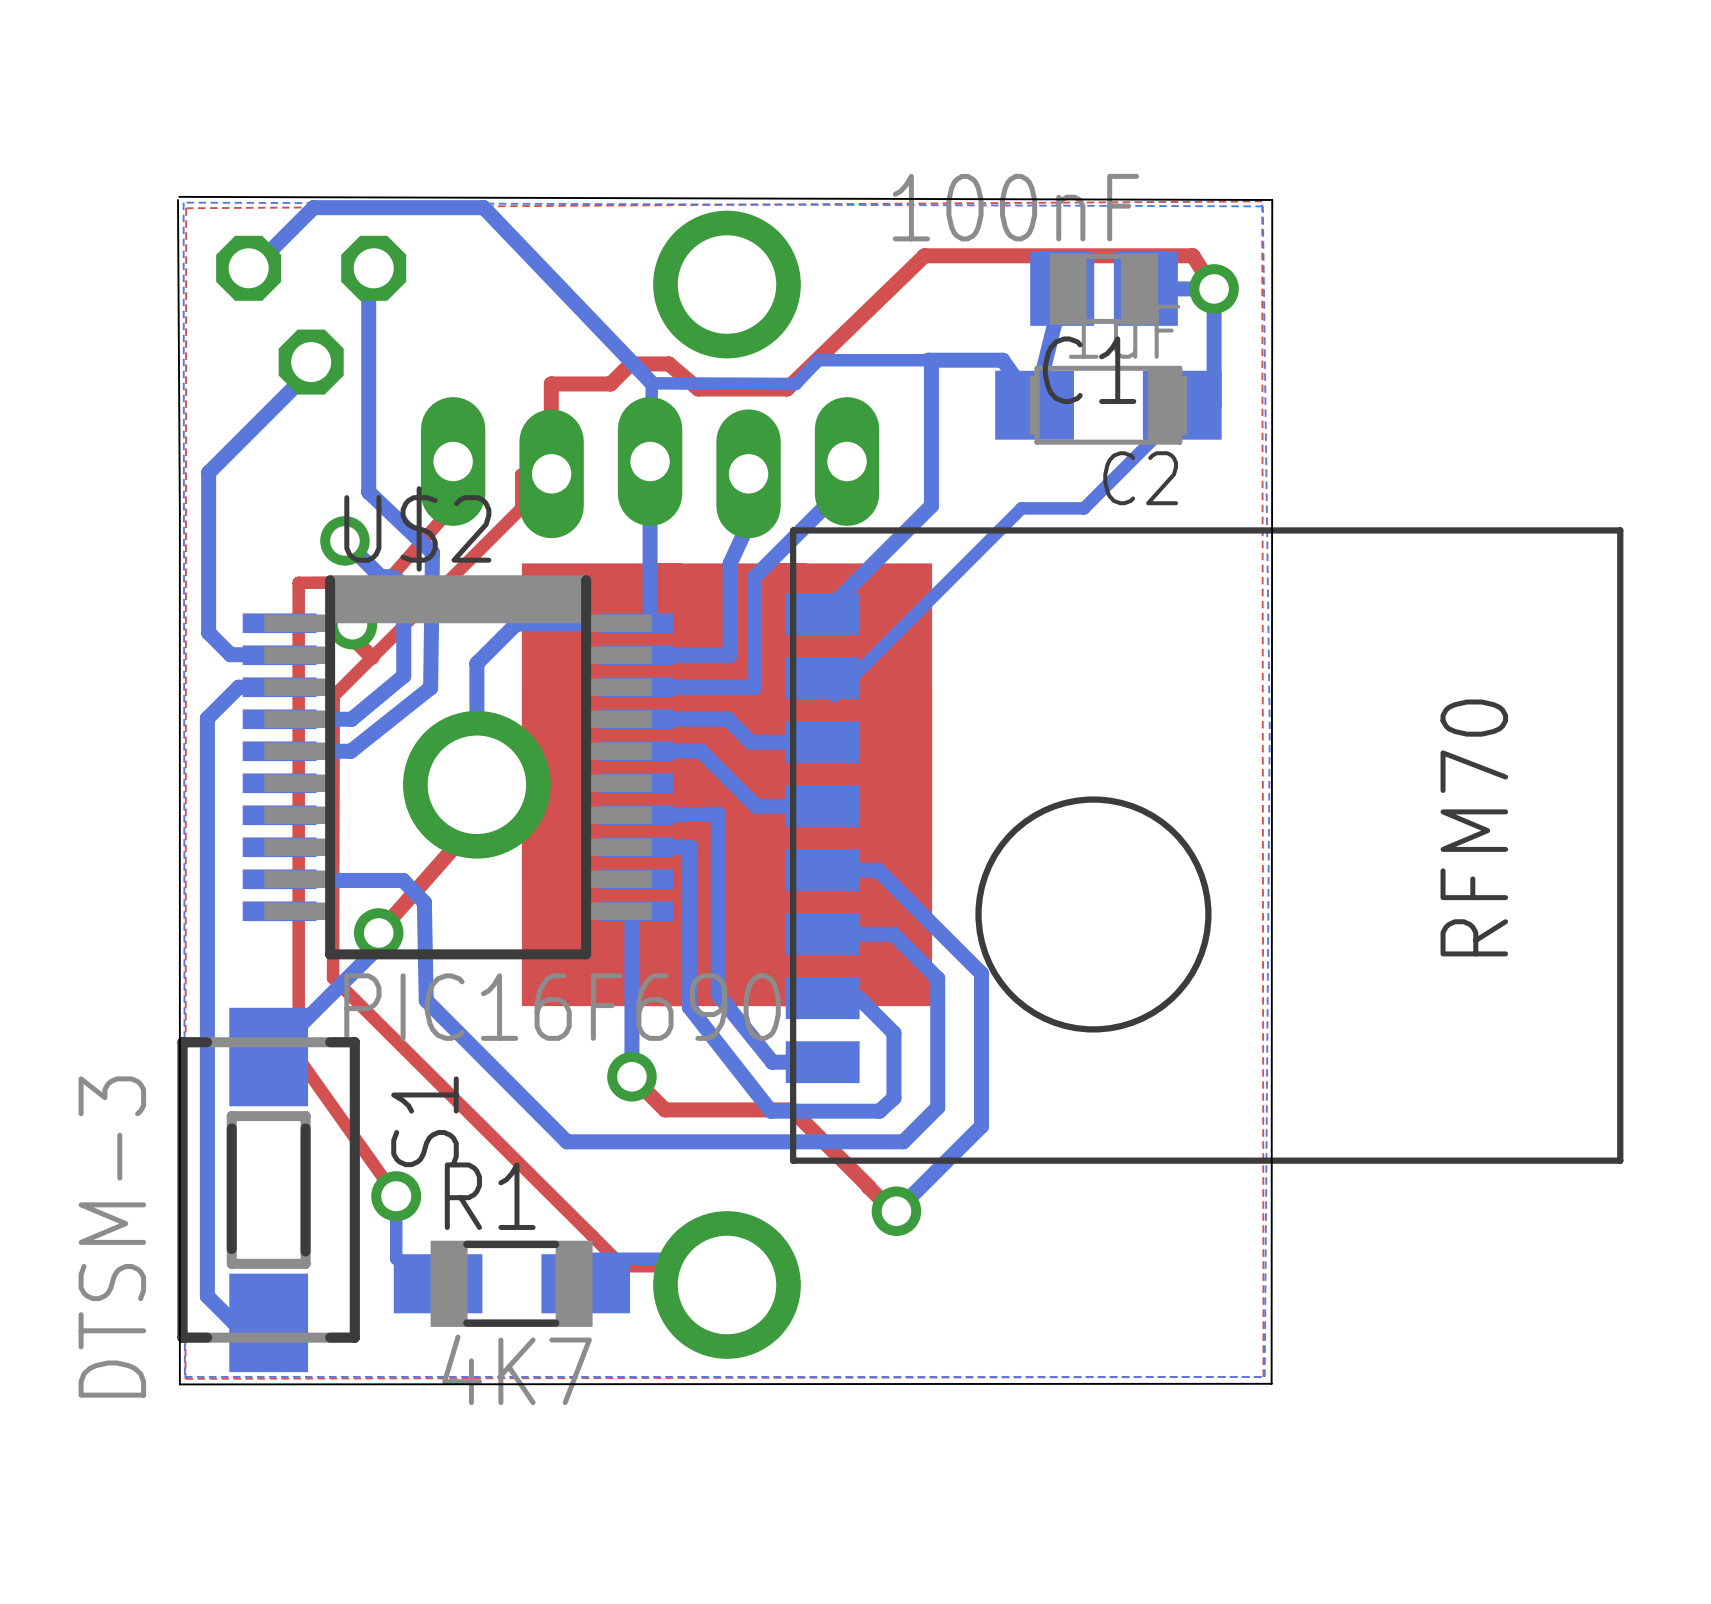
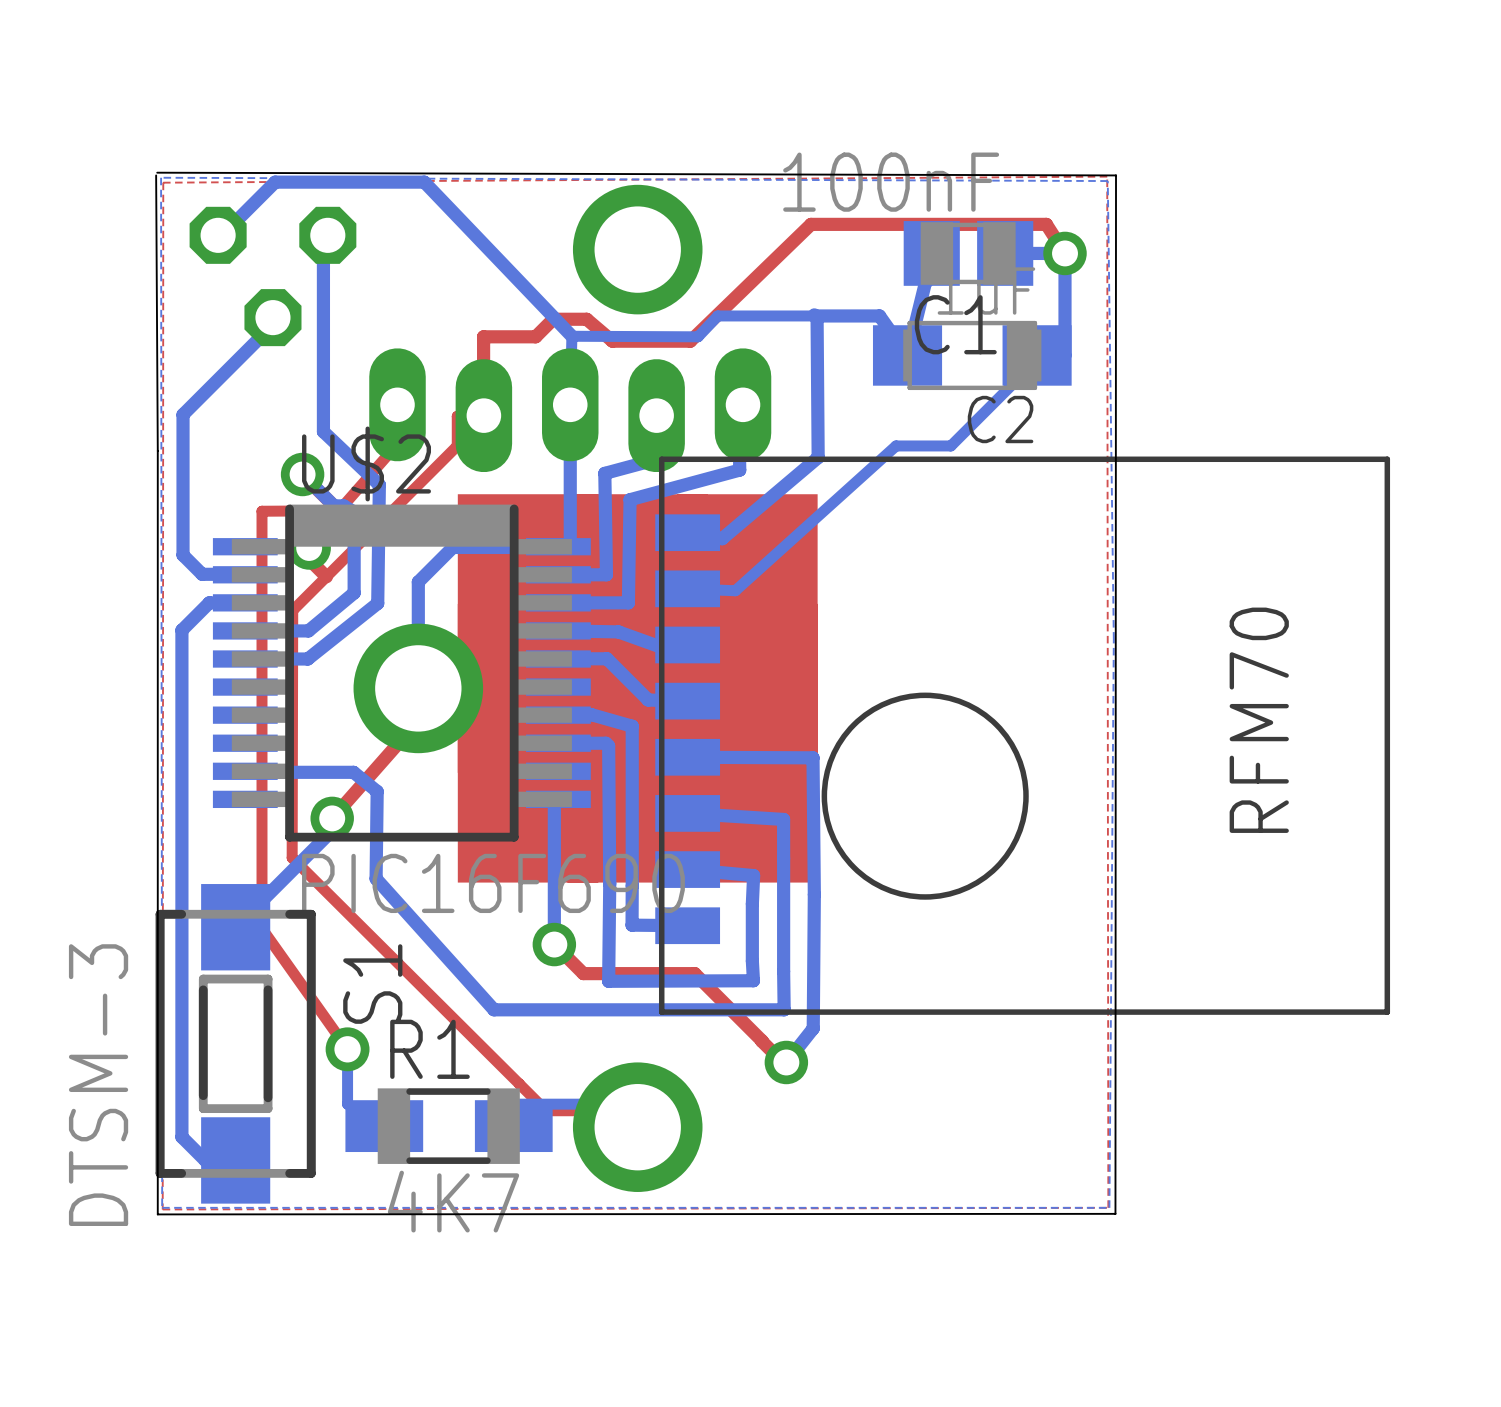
bottom track: (928, 360) (931, 363) (931, 505) (823, 614) -> (814, 314) (817, 318) (818, 457) (722, 538) (687, 532)
bottom track: (842, 452) (842, 489) (754, 577) (754, 687) (716, 687) -> (738, 396) (739, 470) (630, 499) (628, 602)
bottom track: (1021, 508) (833, 695) (822, 678) -> (896, 445) (735, 590) (687, 588)
bottom track: (748, 523) (730, 563) (730, 655) (691, 655) -> (656, 459) (604, 473) (606, 574)
bottom track: (636, 719) (727, 719) (750, 742) (822, 742) -> (558, 630) (618, 631) (659, 646) (687, 644)
bottom track: (691, 751) (700, 751) (755, 806) (822, 806) -> (607, 658) (648, 700) (687, 701)
bottom track: (674, 814) (718, 814) (718, 994) (772, 1062) (822, 1062) -> (591, 714) (632, 726) (632, 925) (687, 925)
part position: (1204, 845) -> (1022, 735)
bottom track: (690, 847) (689, 1007) (770, 1111) (879, 1111) (893, 1098) (893, 1033) (859, 998) (822, 998) -> (605, 743) (608, 745) (608, 981) (753, 980) (753, 875) (687, 869)
bottom track: (822, 870) (878, 870) (981, 973) (981, 1126) (896, 1211) -> (687, 757) (813, 757) (813, 1028) (786, 1062)
bottom track: (403, 880) (424, 902) (426, 1000) (566, 1141) (903, 1141) (937, 1107) (937, 978) (893, 934) (822, 934) -> (353, 772) (377, 791) (376, 878) (494, 1009) (784, 1009) (783, 819) (687, 813)

